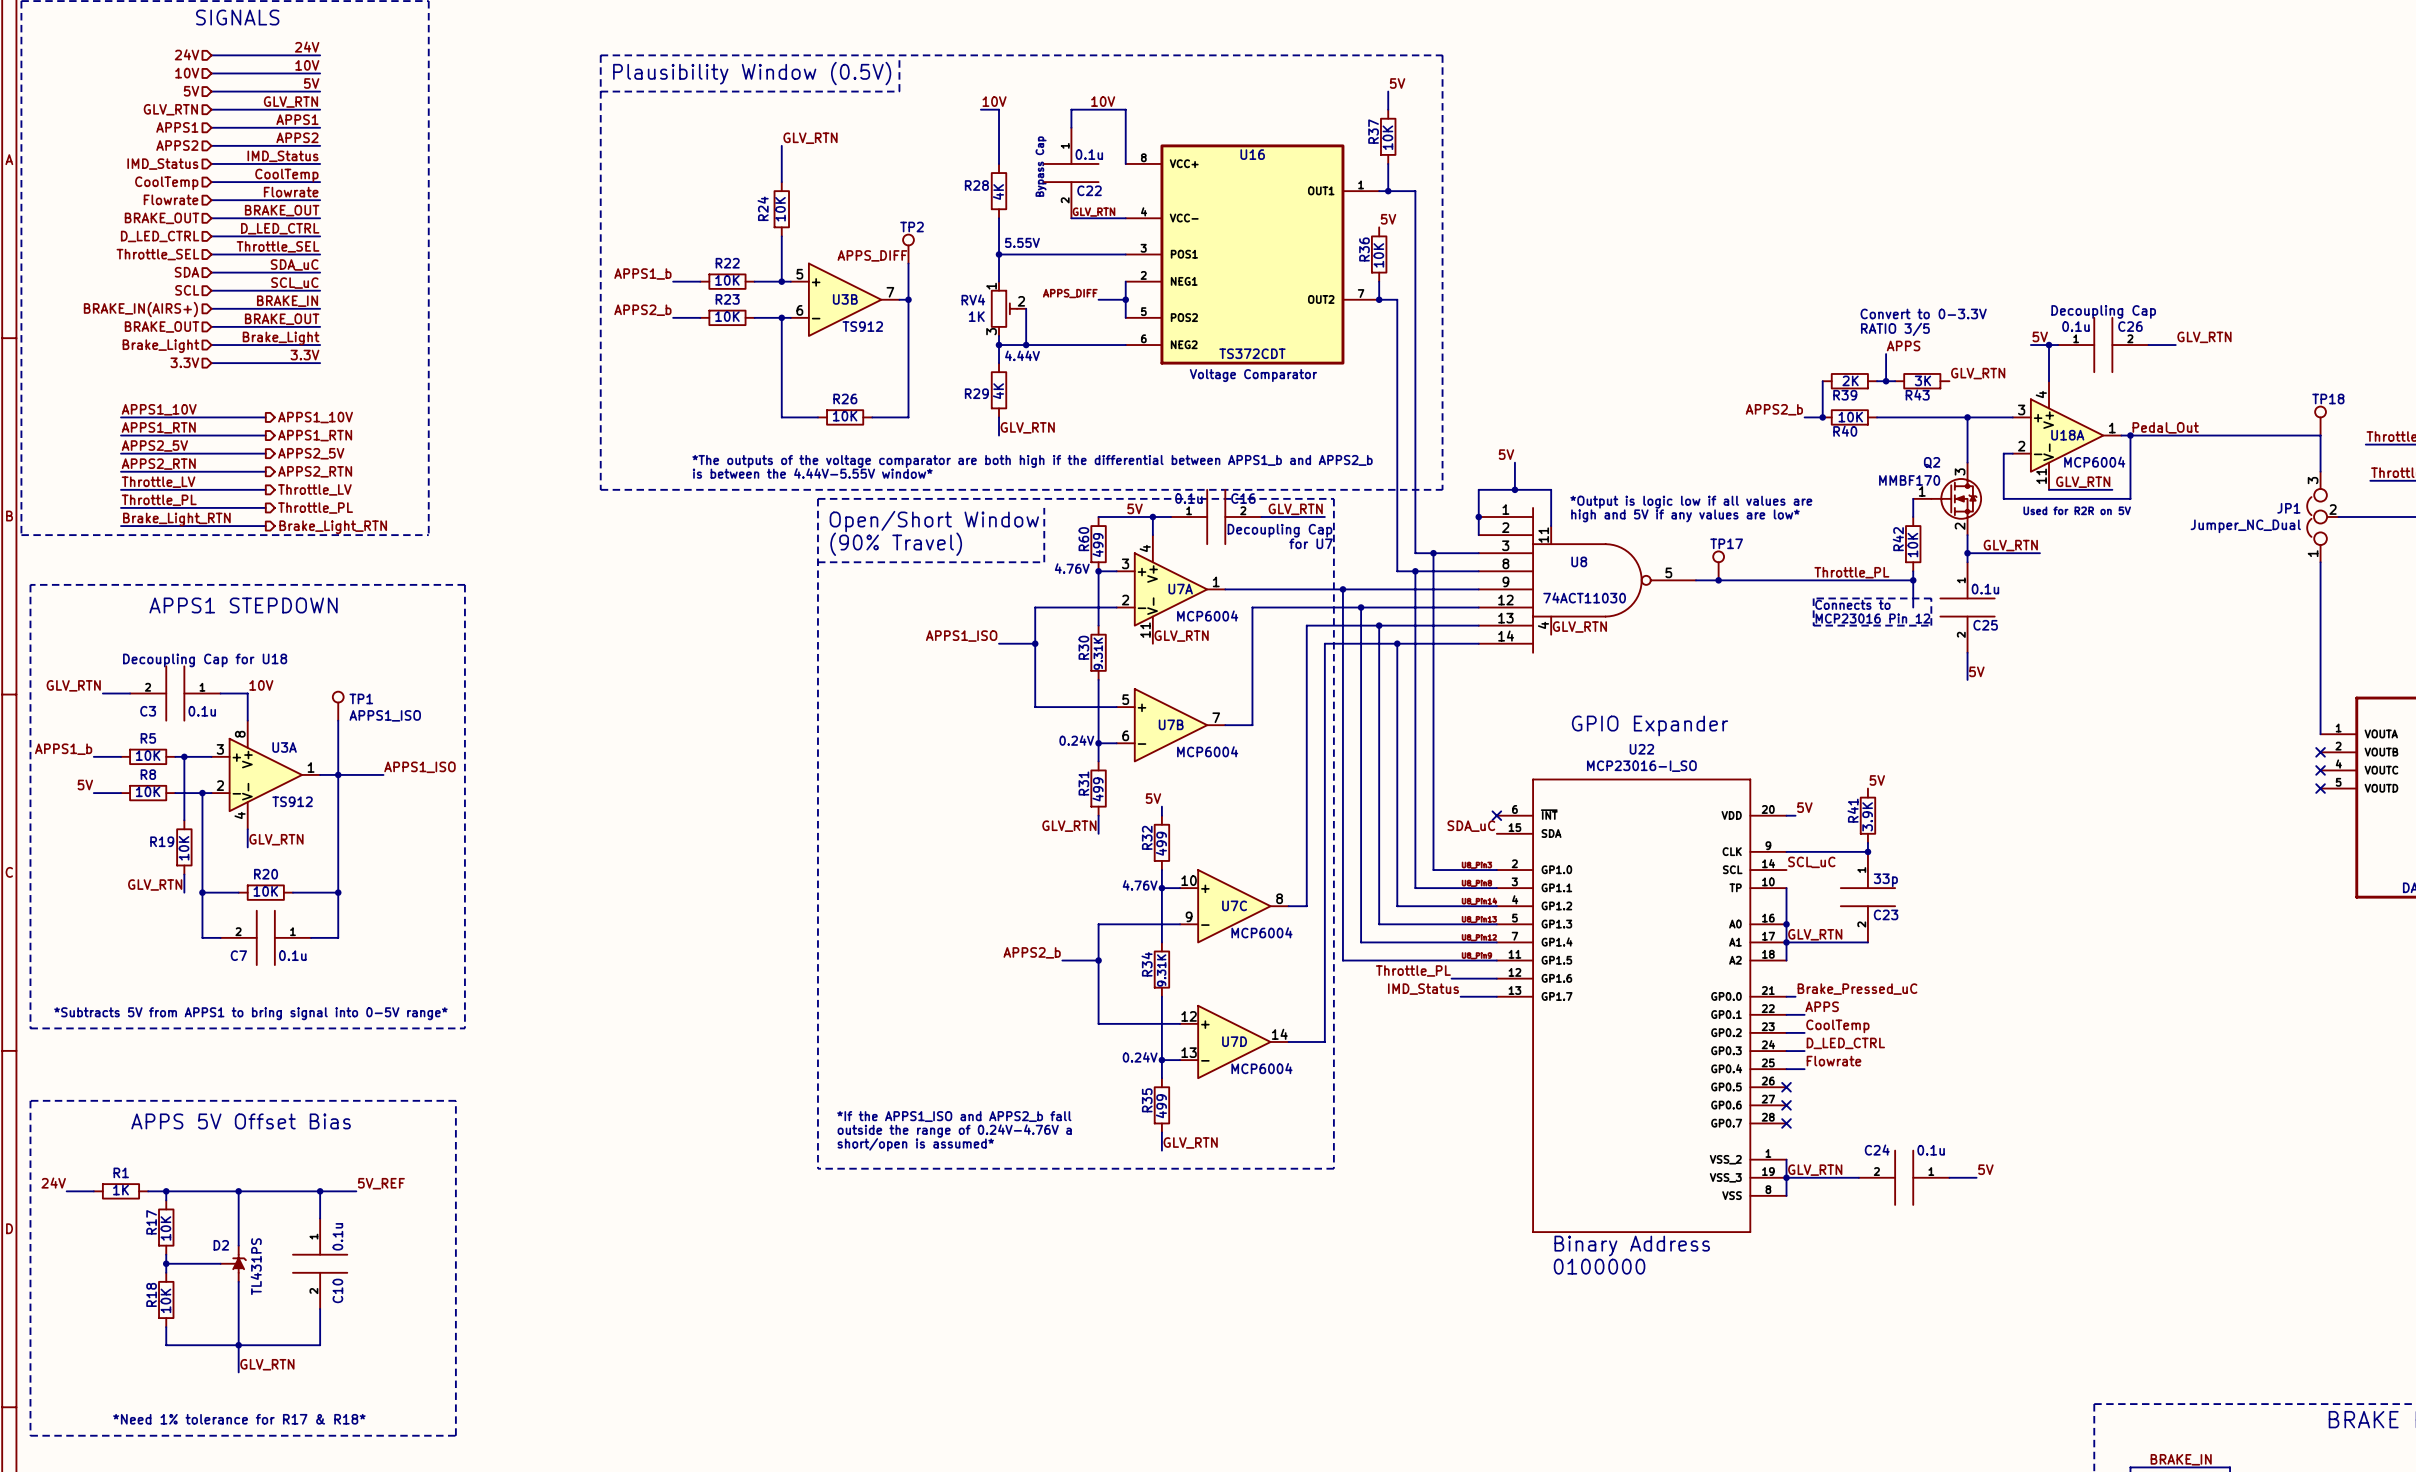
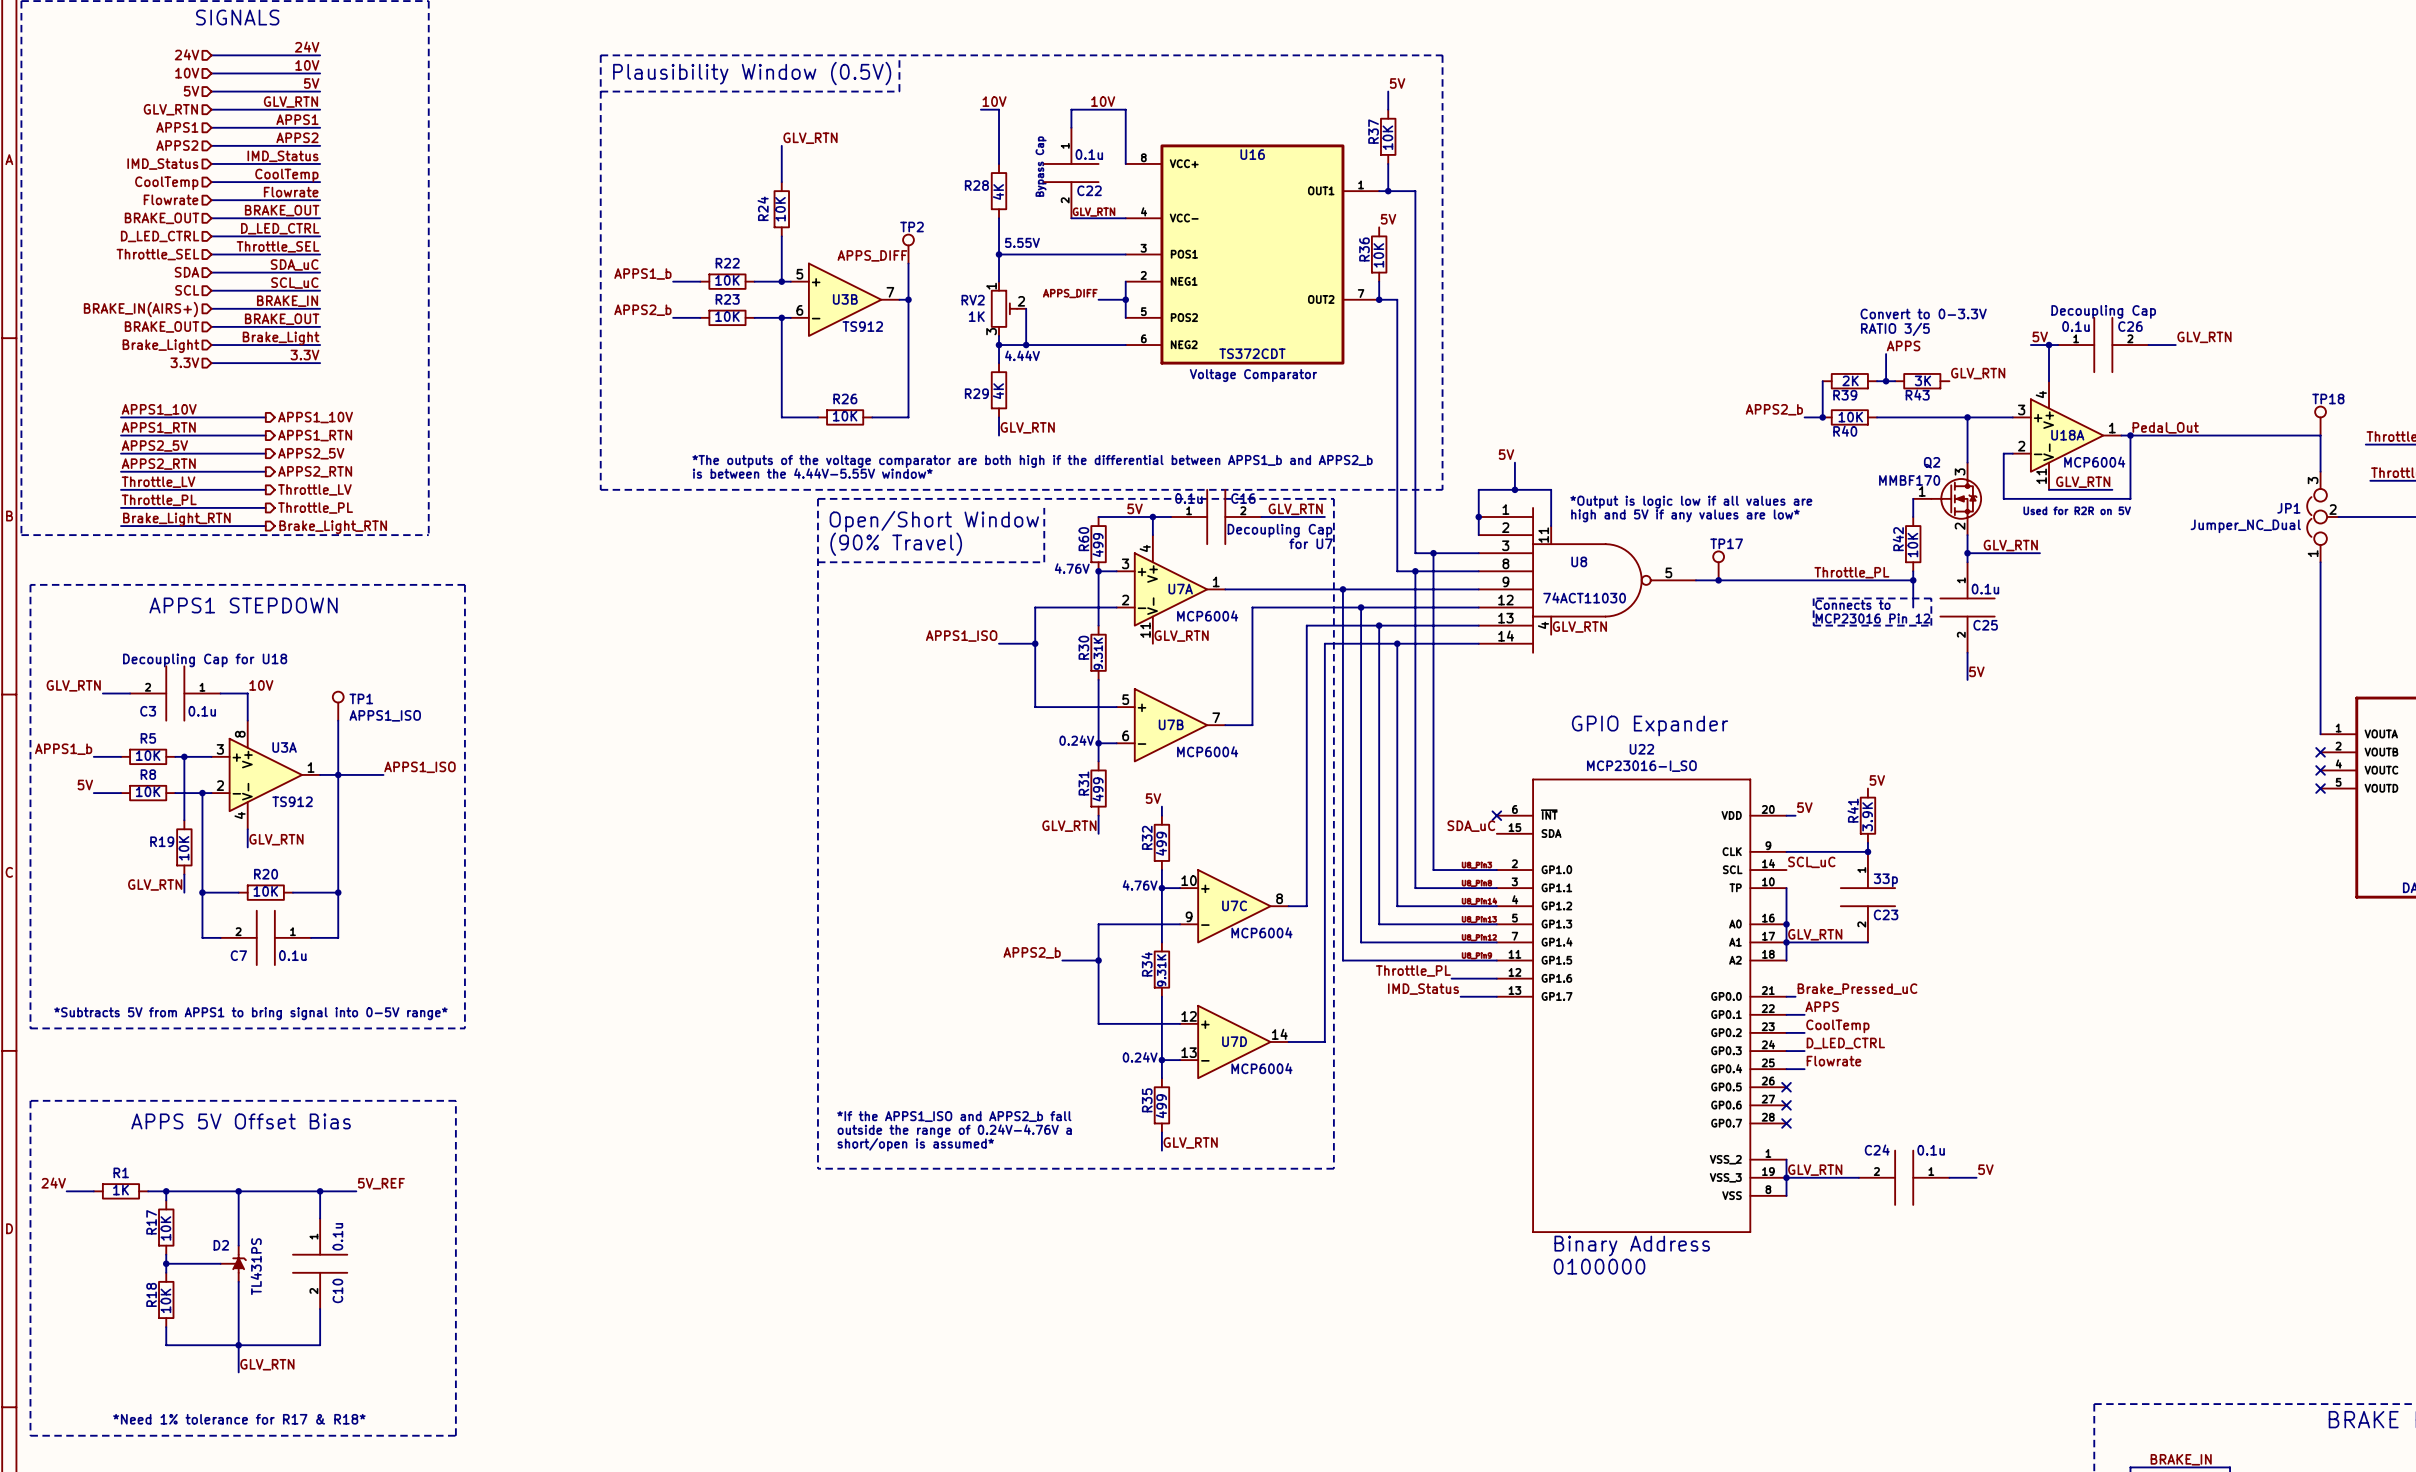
RV4 name: RV4 (973, 299) -> RV2 (973, 300)

